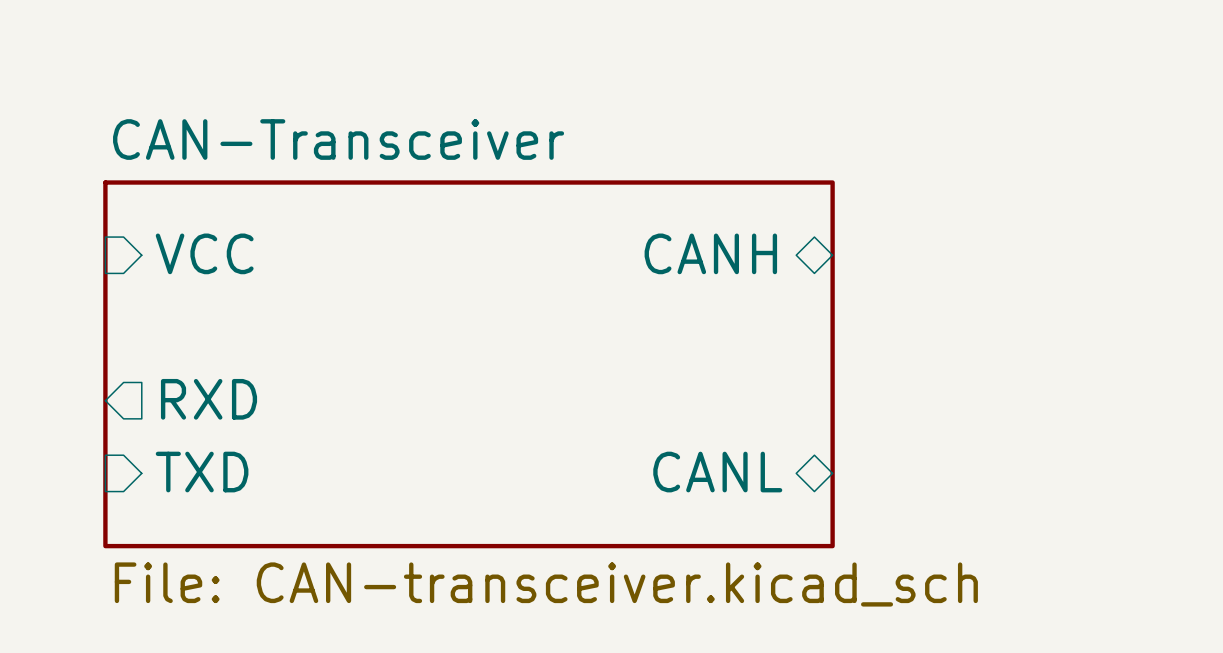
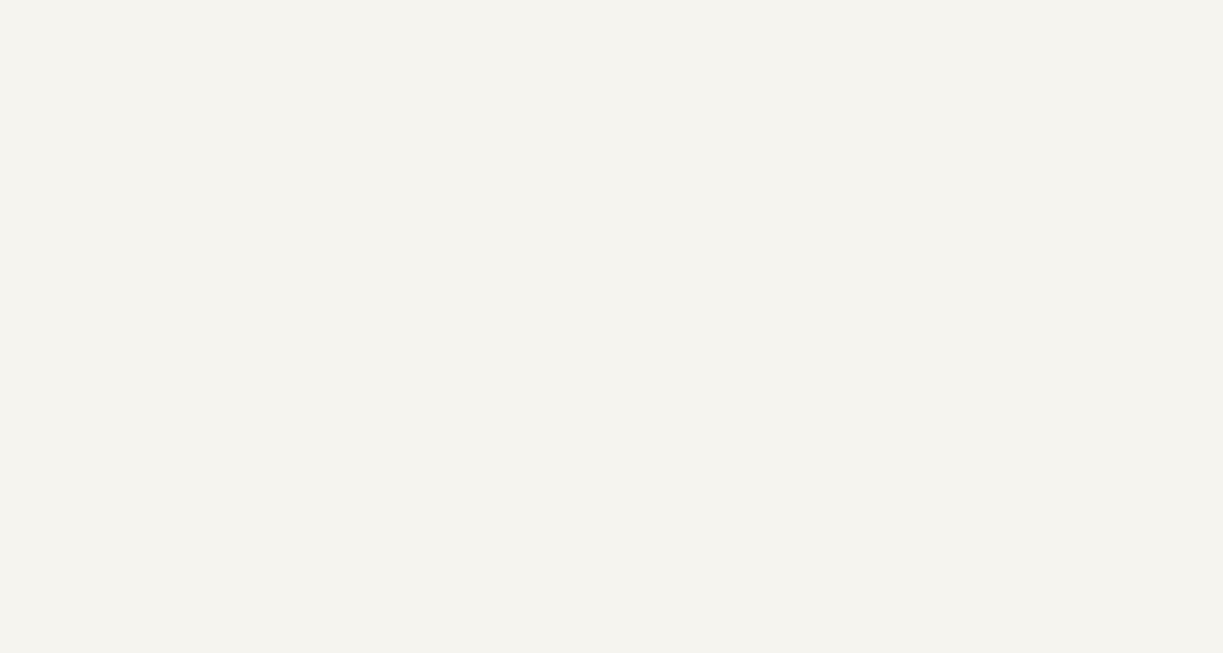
sheet pin: VCC (204, 253) -> none
sheet pin: CANH (710, 253) -> none
sheet CAN-Transceiver: File: CAN-transceiver.kicad_sch (469, 364) -> none
sheet pin: RXD (209, 399) -> none
sheet pin: TXD (202, 472) -> none
sheet pin: CANL (717, 472) -> none

